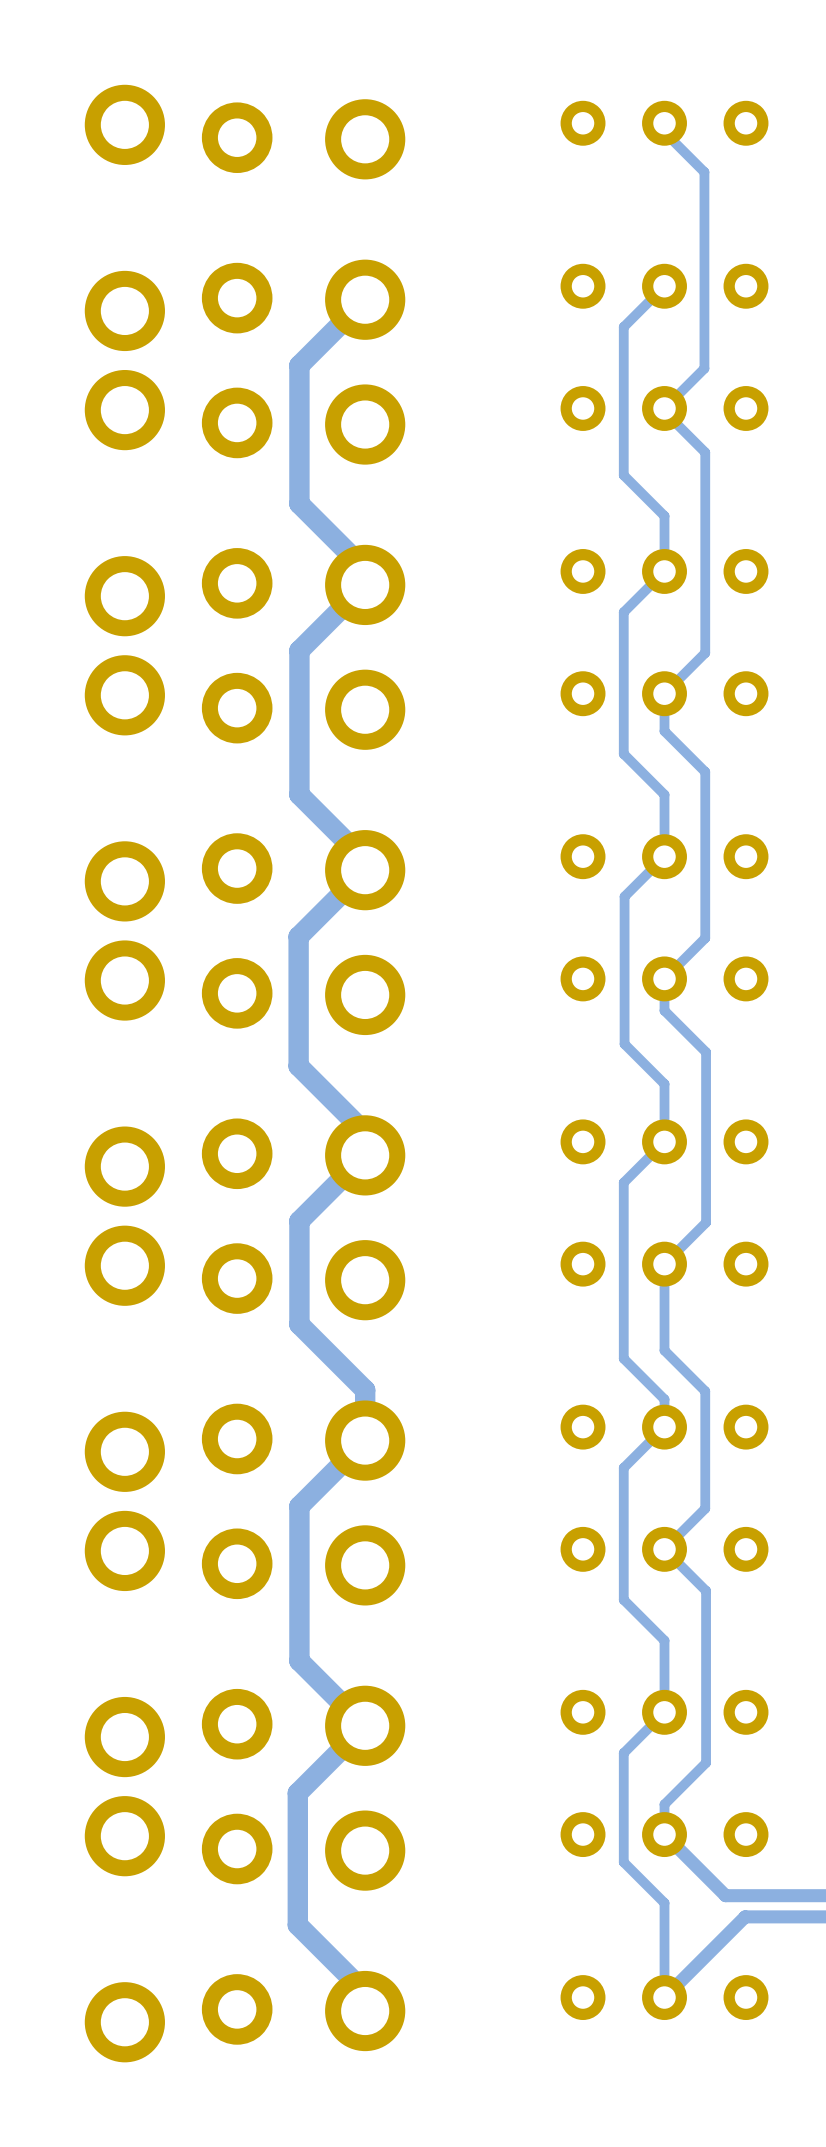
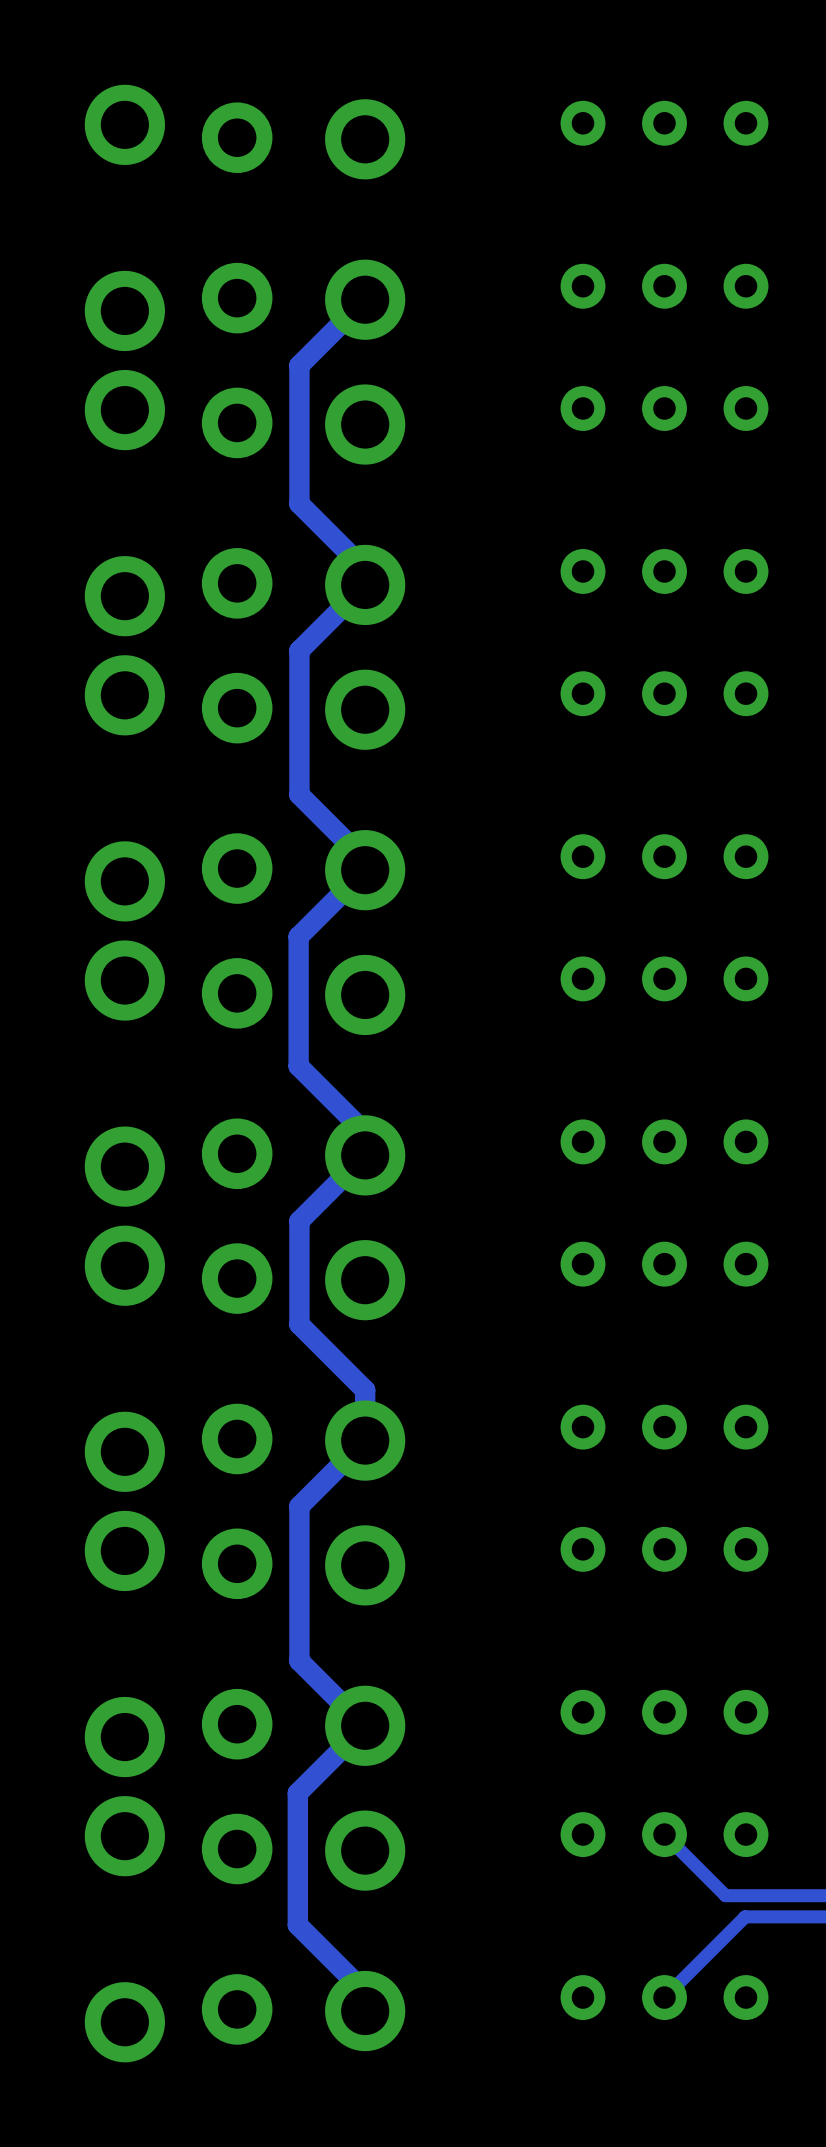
track: (664, 123) (664, 132) (704, 172) (704, 368) (664, 408) (664, 411) (705, 452) (705, 652) (664, 693) (664, 731) (705, 771) (705, 938) (664, 978) (664, 1010) (706, 1052) (706, 1222) (664, 1264) (664, 1350) (705, 1391) (705, 1508) (664, 1549) (706, 1590) (706, 1762) (664, 1804) (664, 1834) -> none
track: (664, 286) (623, 327) (623, 475) (664, 516) (664, 571) (623, 612) (623, 754) (664, 794) (664, 856) (624, 896) (624, 1044) (664, 1084) (664, 1141) (623, 1182) (623, 1358) (664, 1399) (664, 1427) (623, 1467) (623, 1599) (664, 1640) (664, 1712) (623, 1753) (623, 1862) (664, 1903) (664, 1997) -> none

